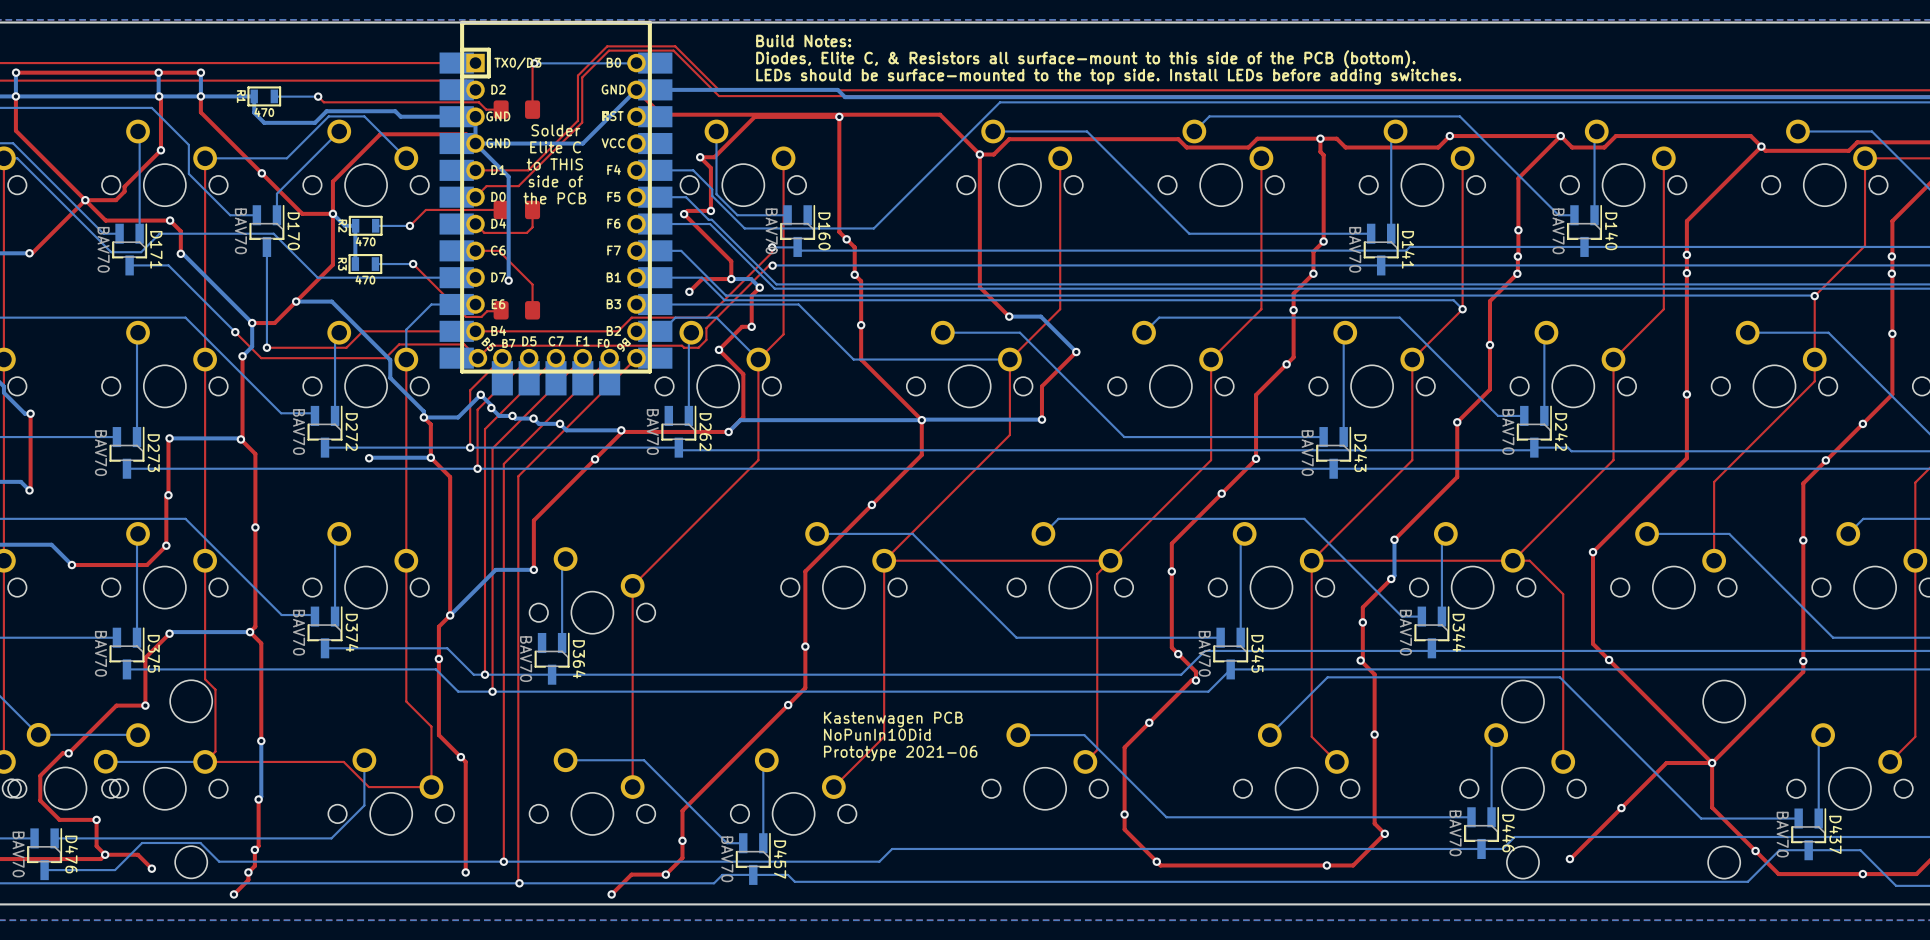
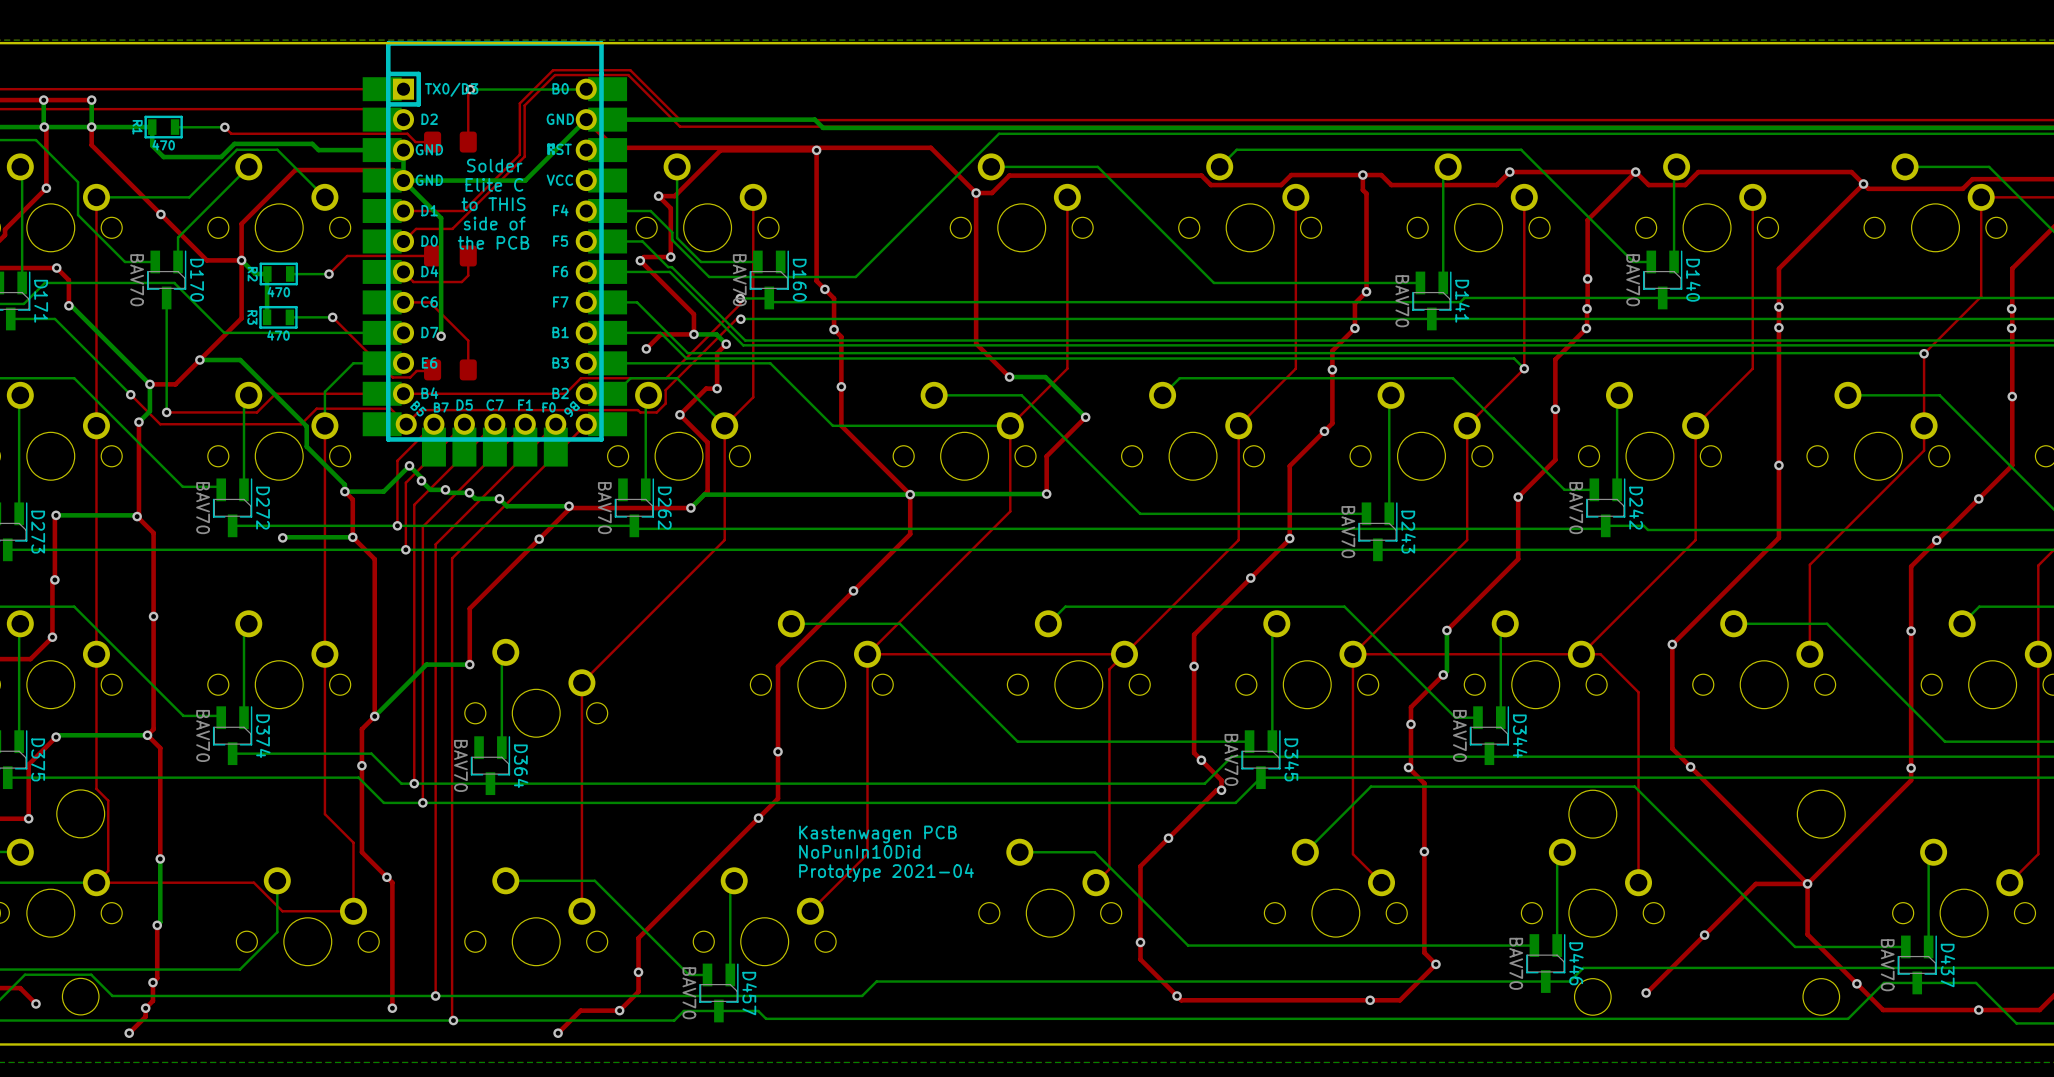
text: Build Notes: (803, 41) -> none
text: Diodes, Elite C, & Resistors all surface-mount to this side of the PCB (bottom). (1085, 59) -> none
text: LEDs should be surface-mounted to the top side. Install LEDs before adding switches. (1108, 76) -> none
text: Prototype 2021-06 (900, 753) -> Prototype 2021-04 (886, 872)

